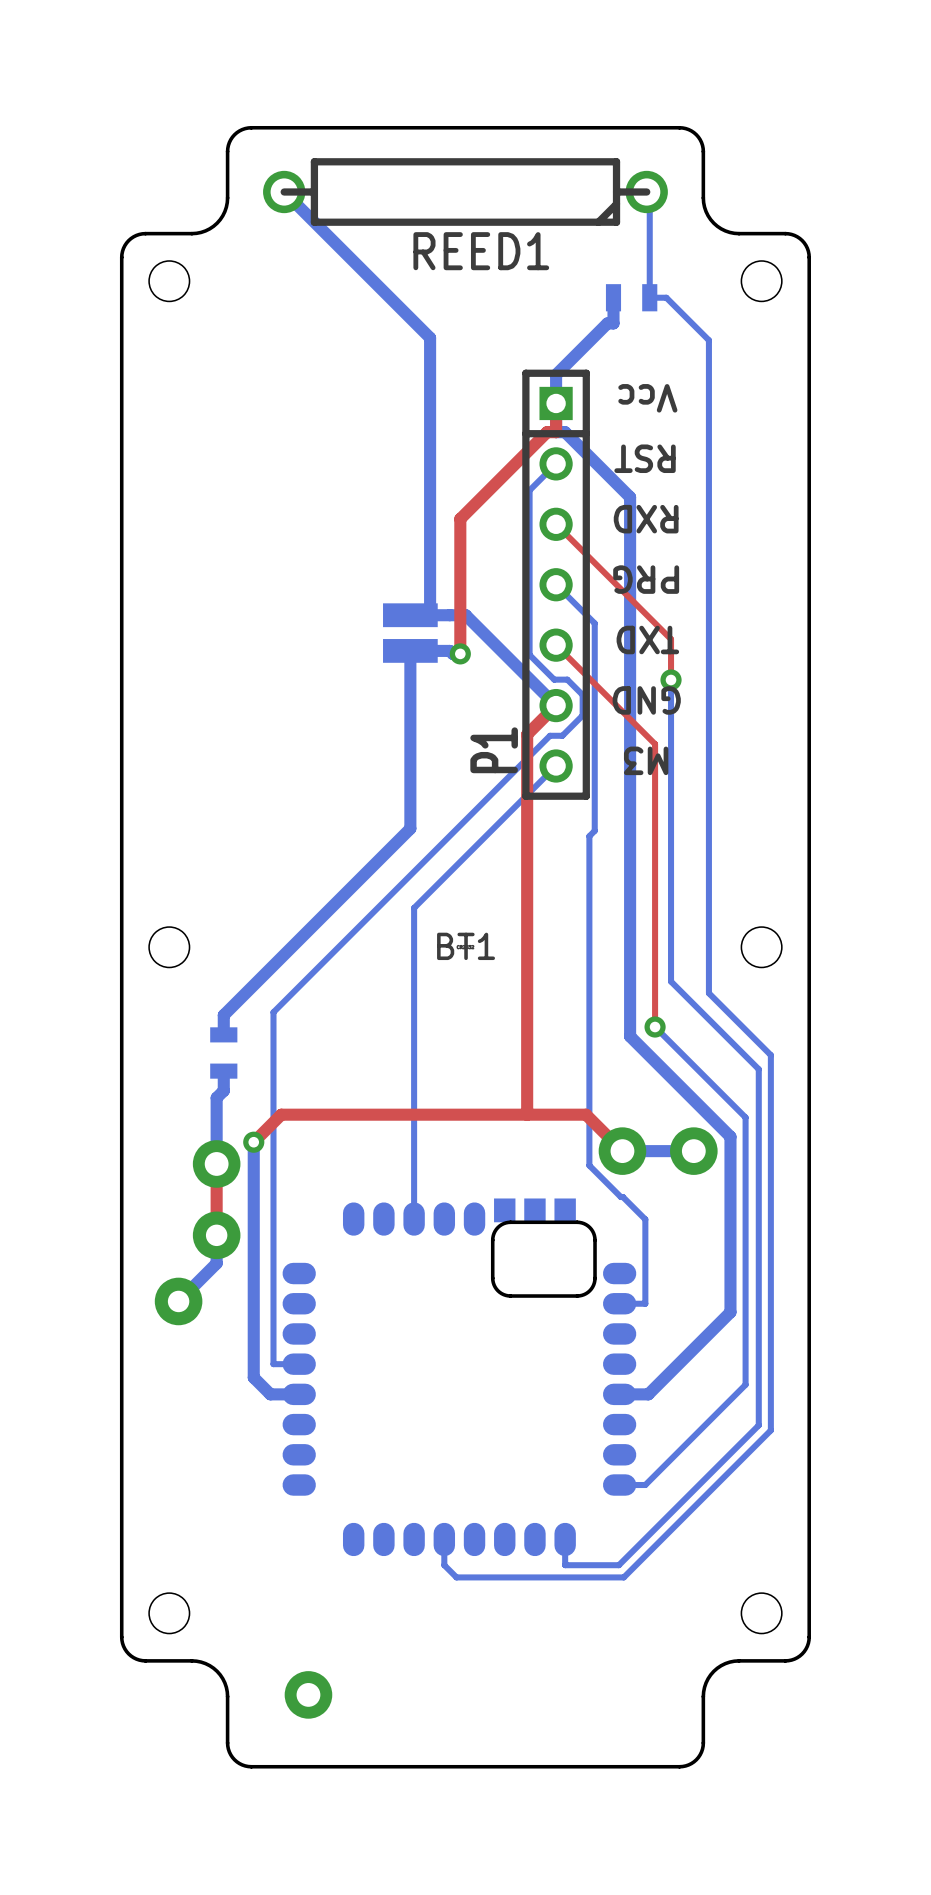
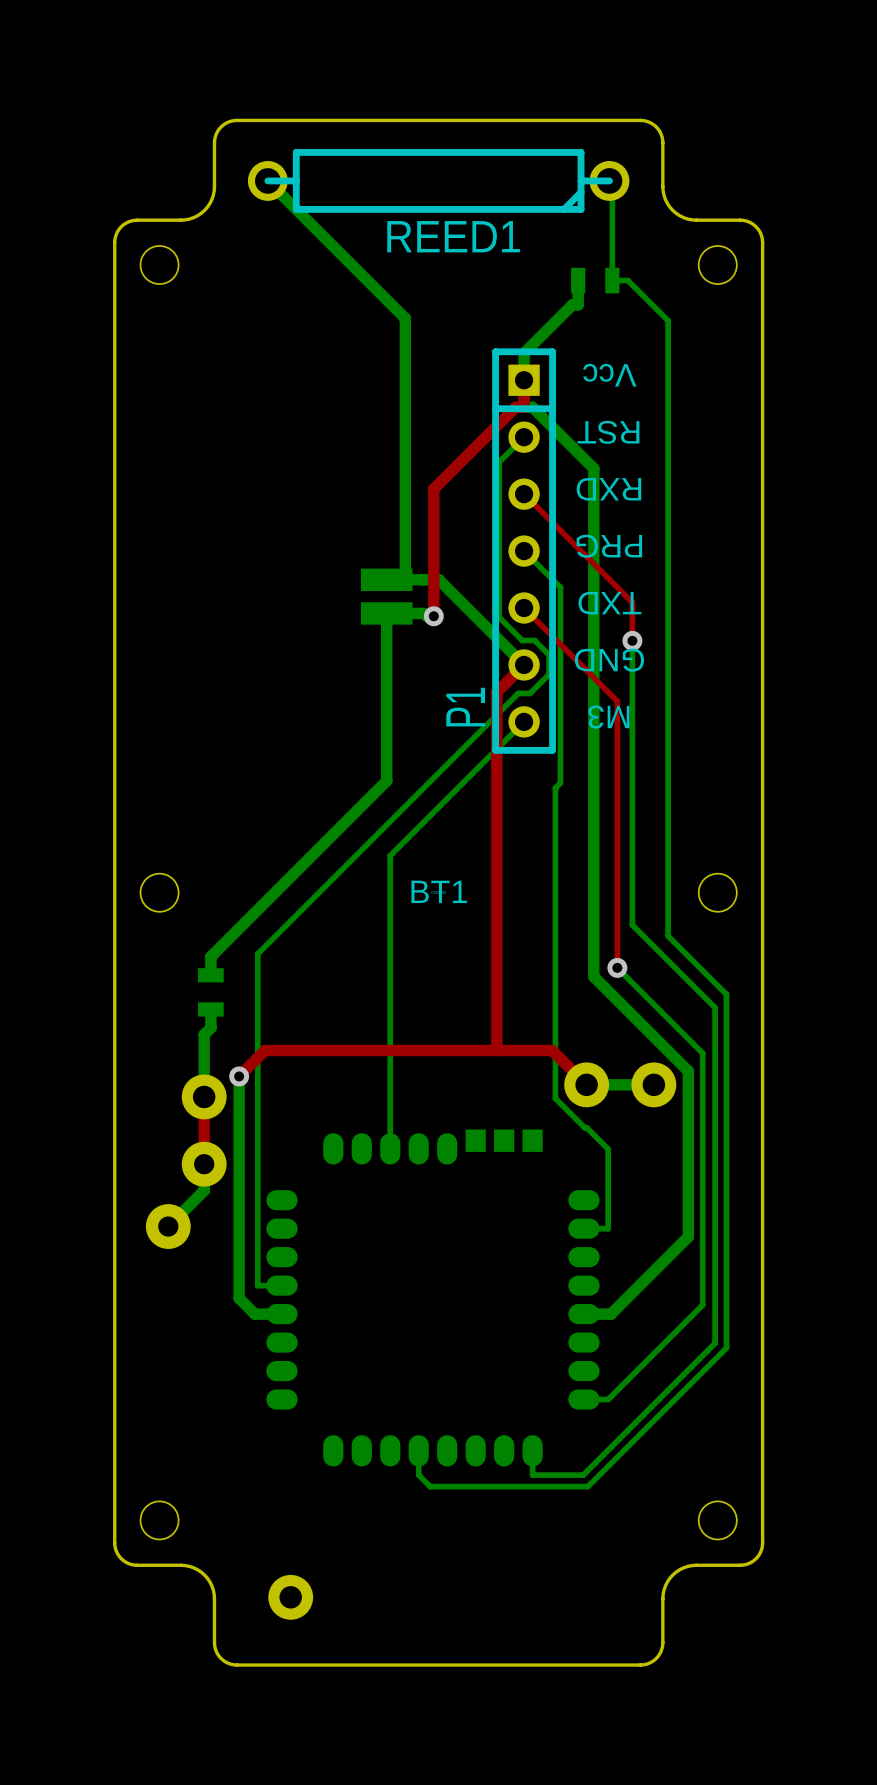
part footprint: [282, 1198, 637, 1557] -> [266, 1129, 600, 1467]

